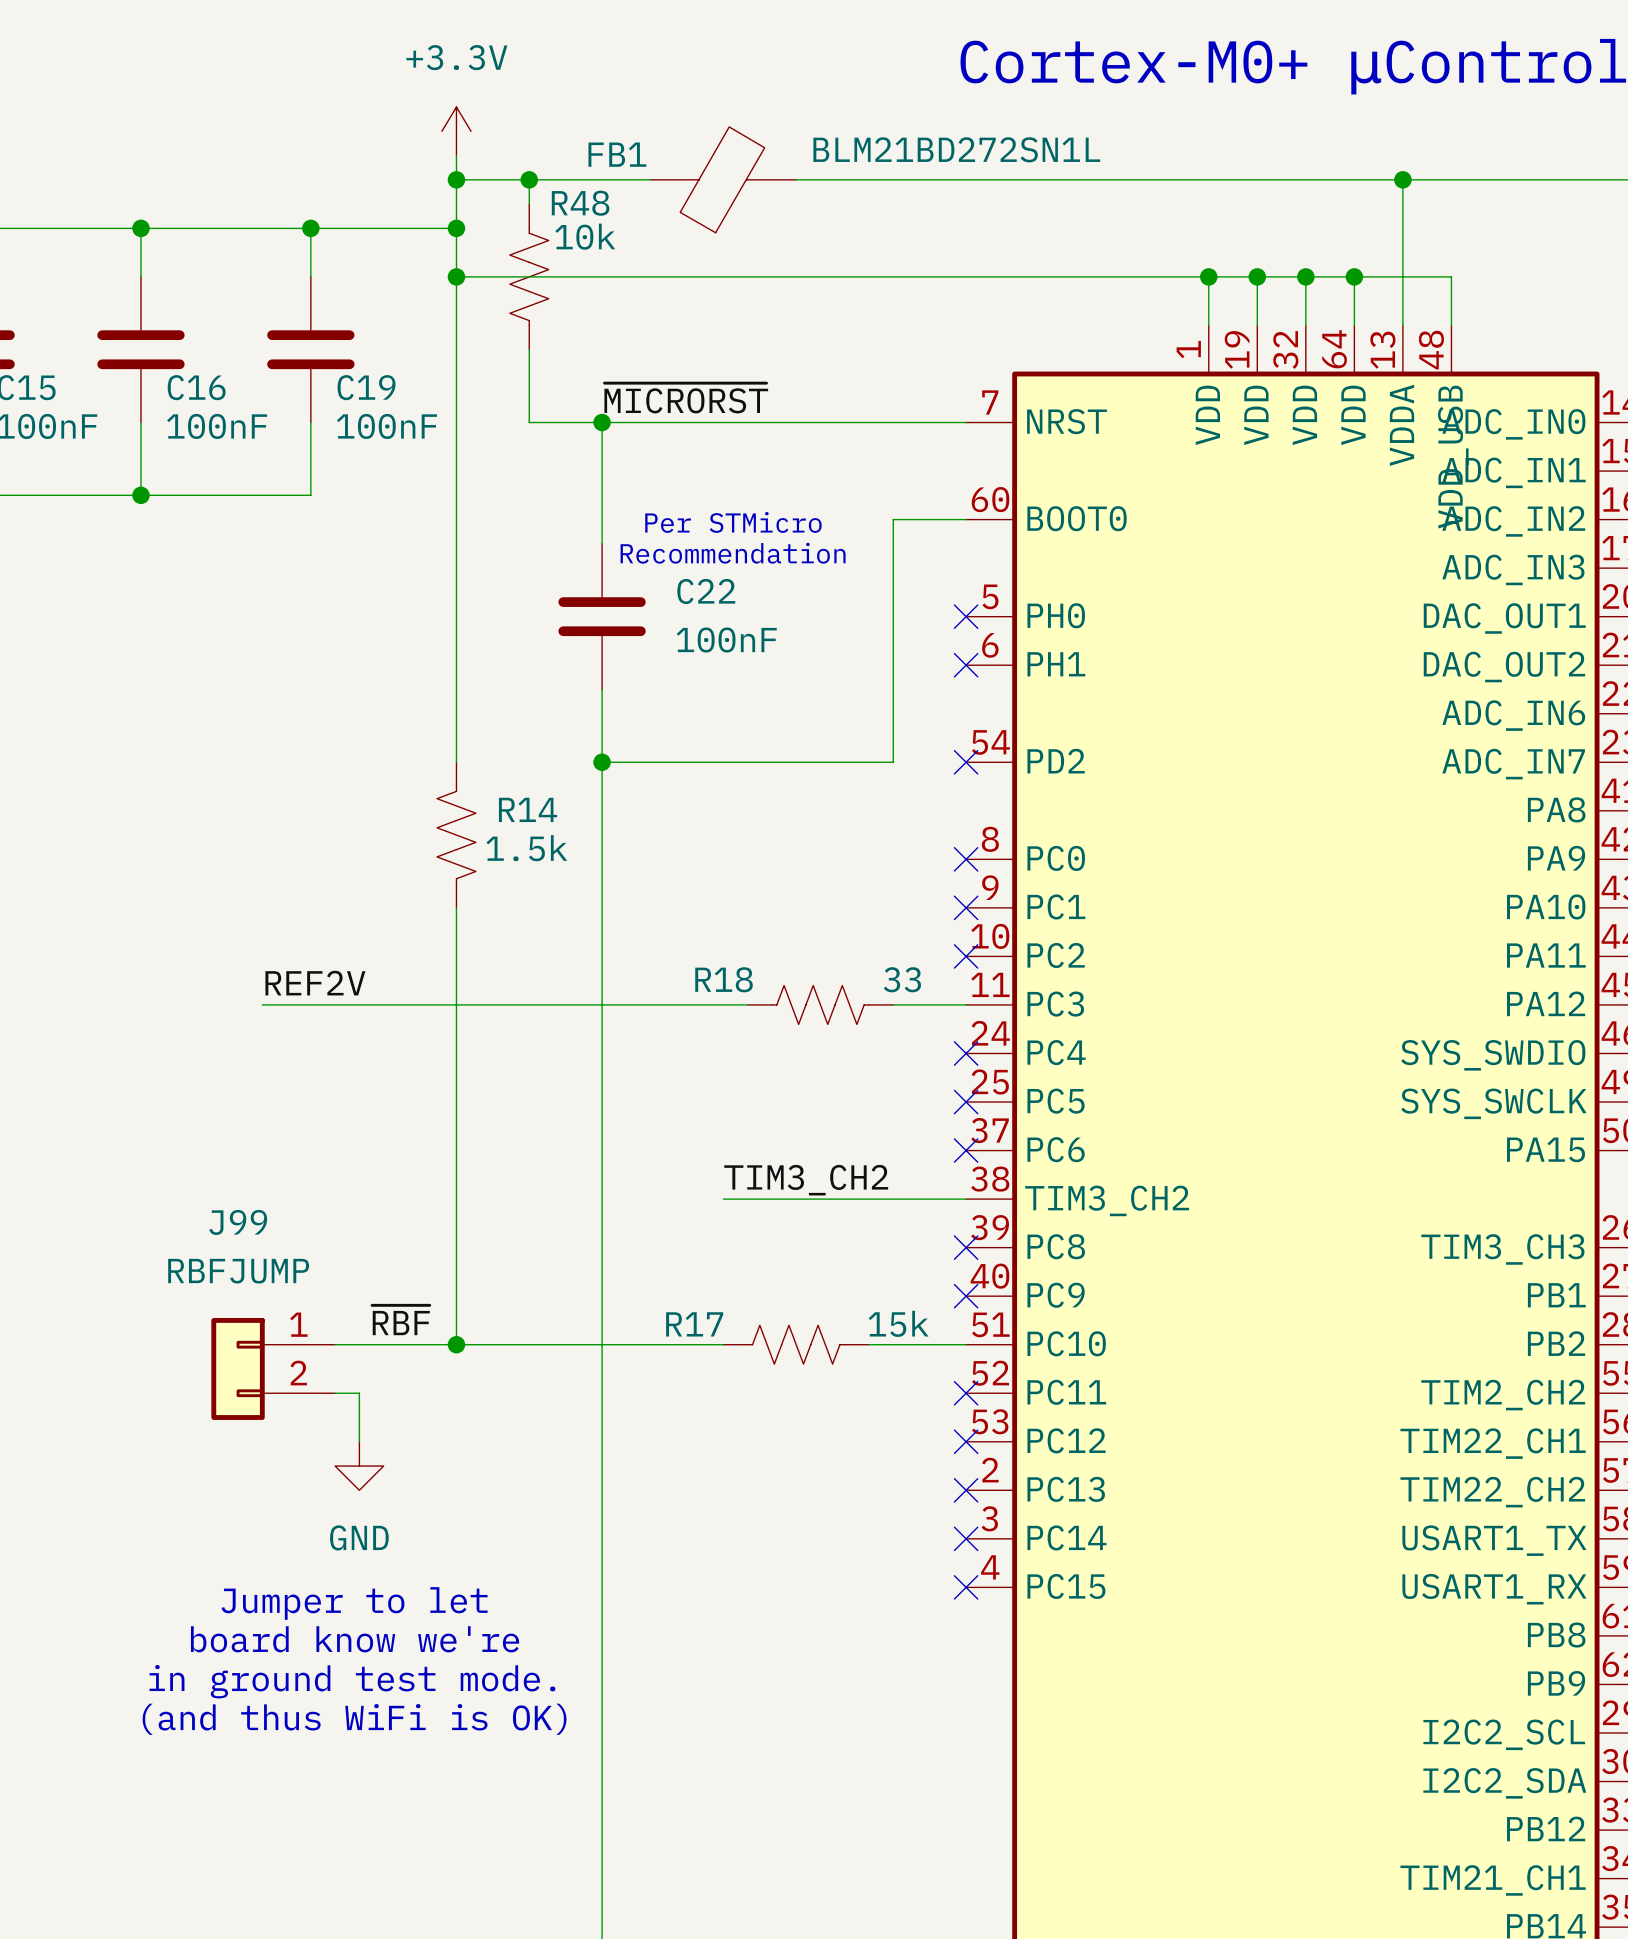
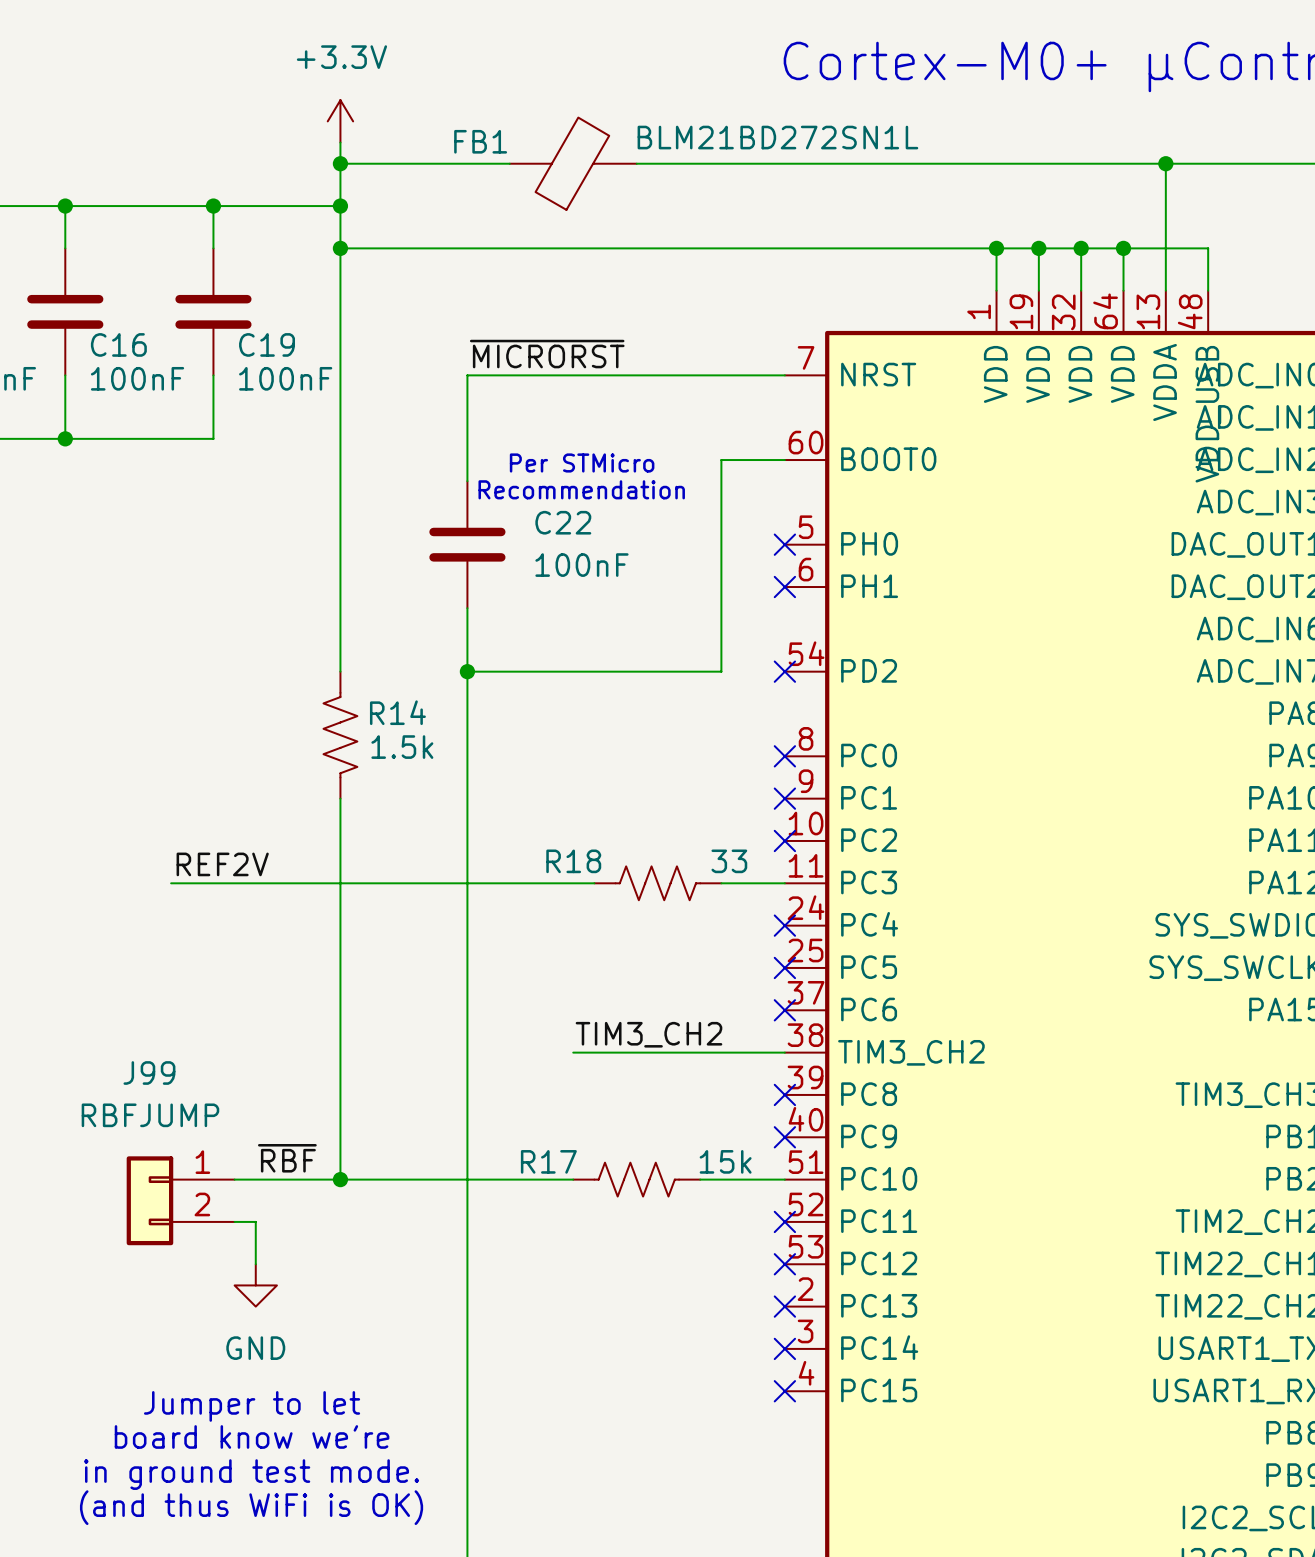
wire: (529, 179) (529, 204) -> none
junction: (529, 179) -> none
R48: 10k (529, 276) -> none
wire: (529, 349) (529, 422) (602, 422) -> none
junction: (602, 422) -> none

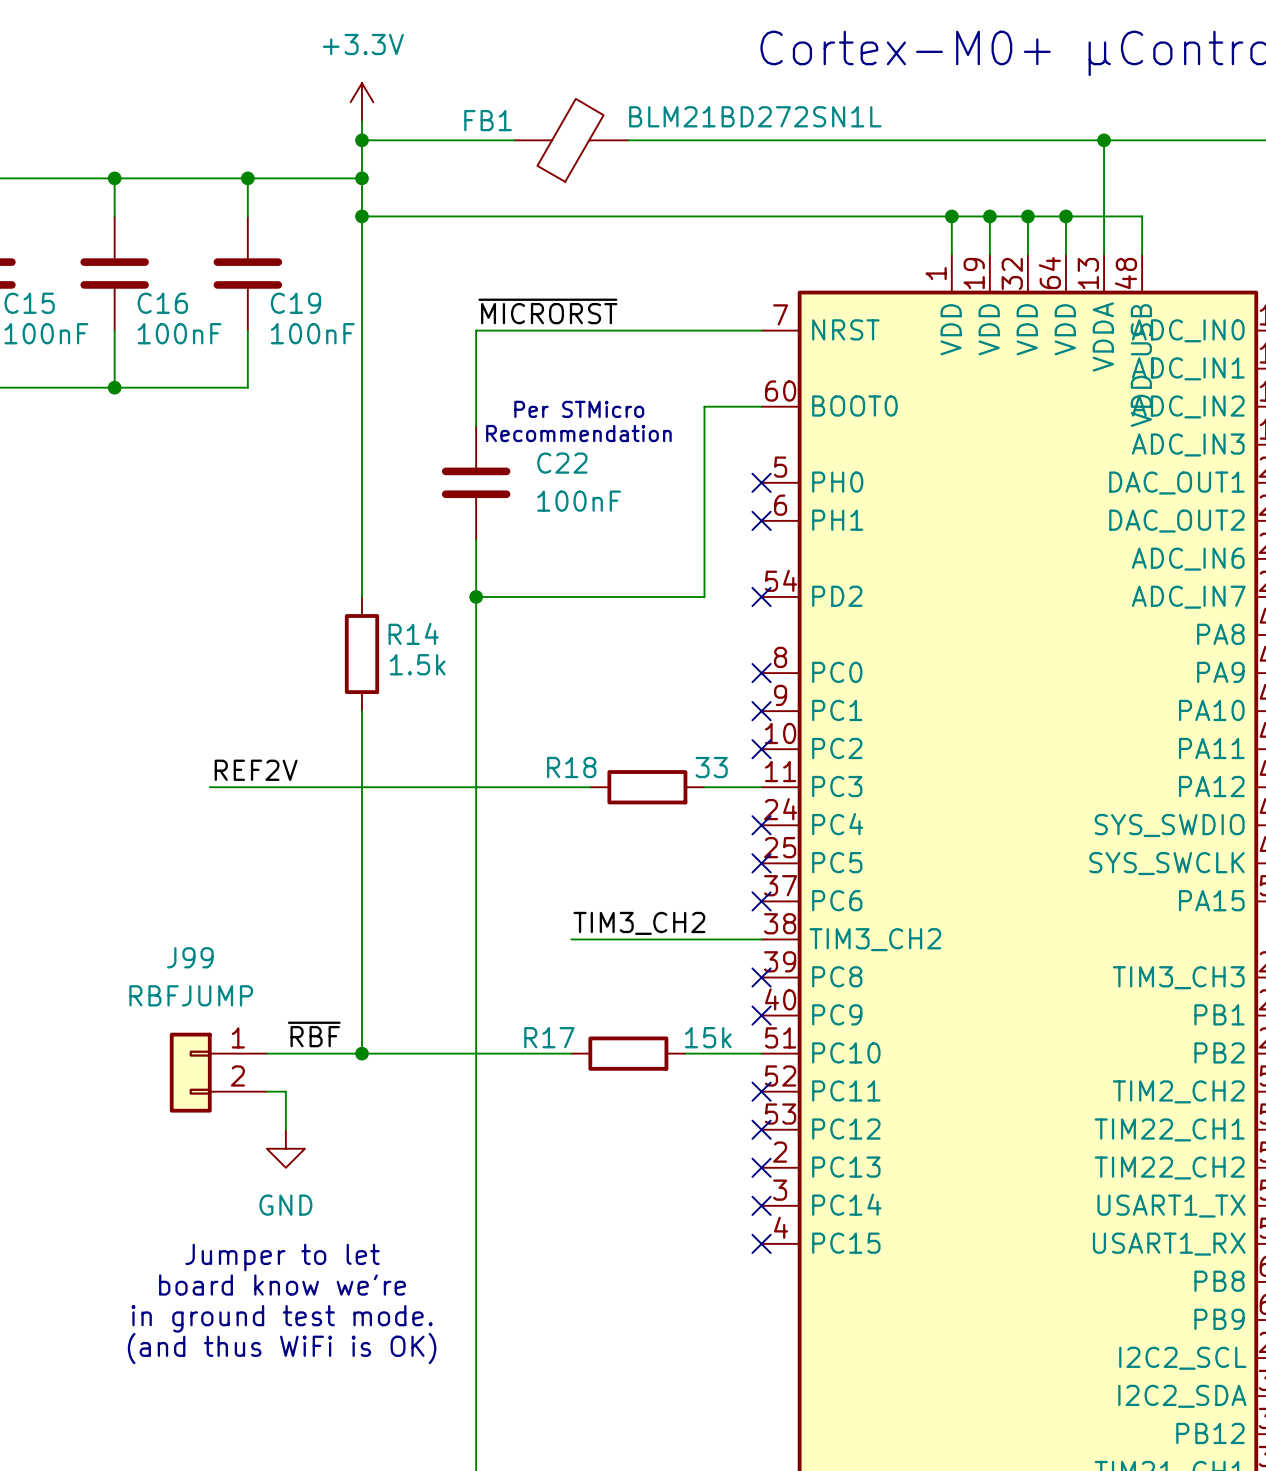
R14 symbol: [323, 671, 358, 799] -> [344, 596, 380, 712]
R18 symbol: [594, 866, 722, 901] -> [590, 770, 705, 805]
R17 symbol: [573, 1162, 701, 1197] -> [571, 1036, 686, 1071]

